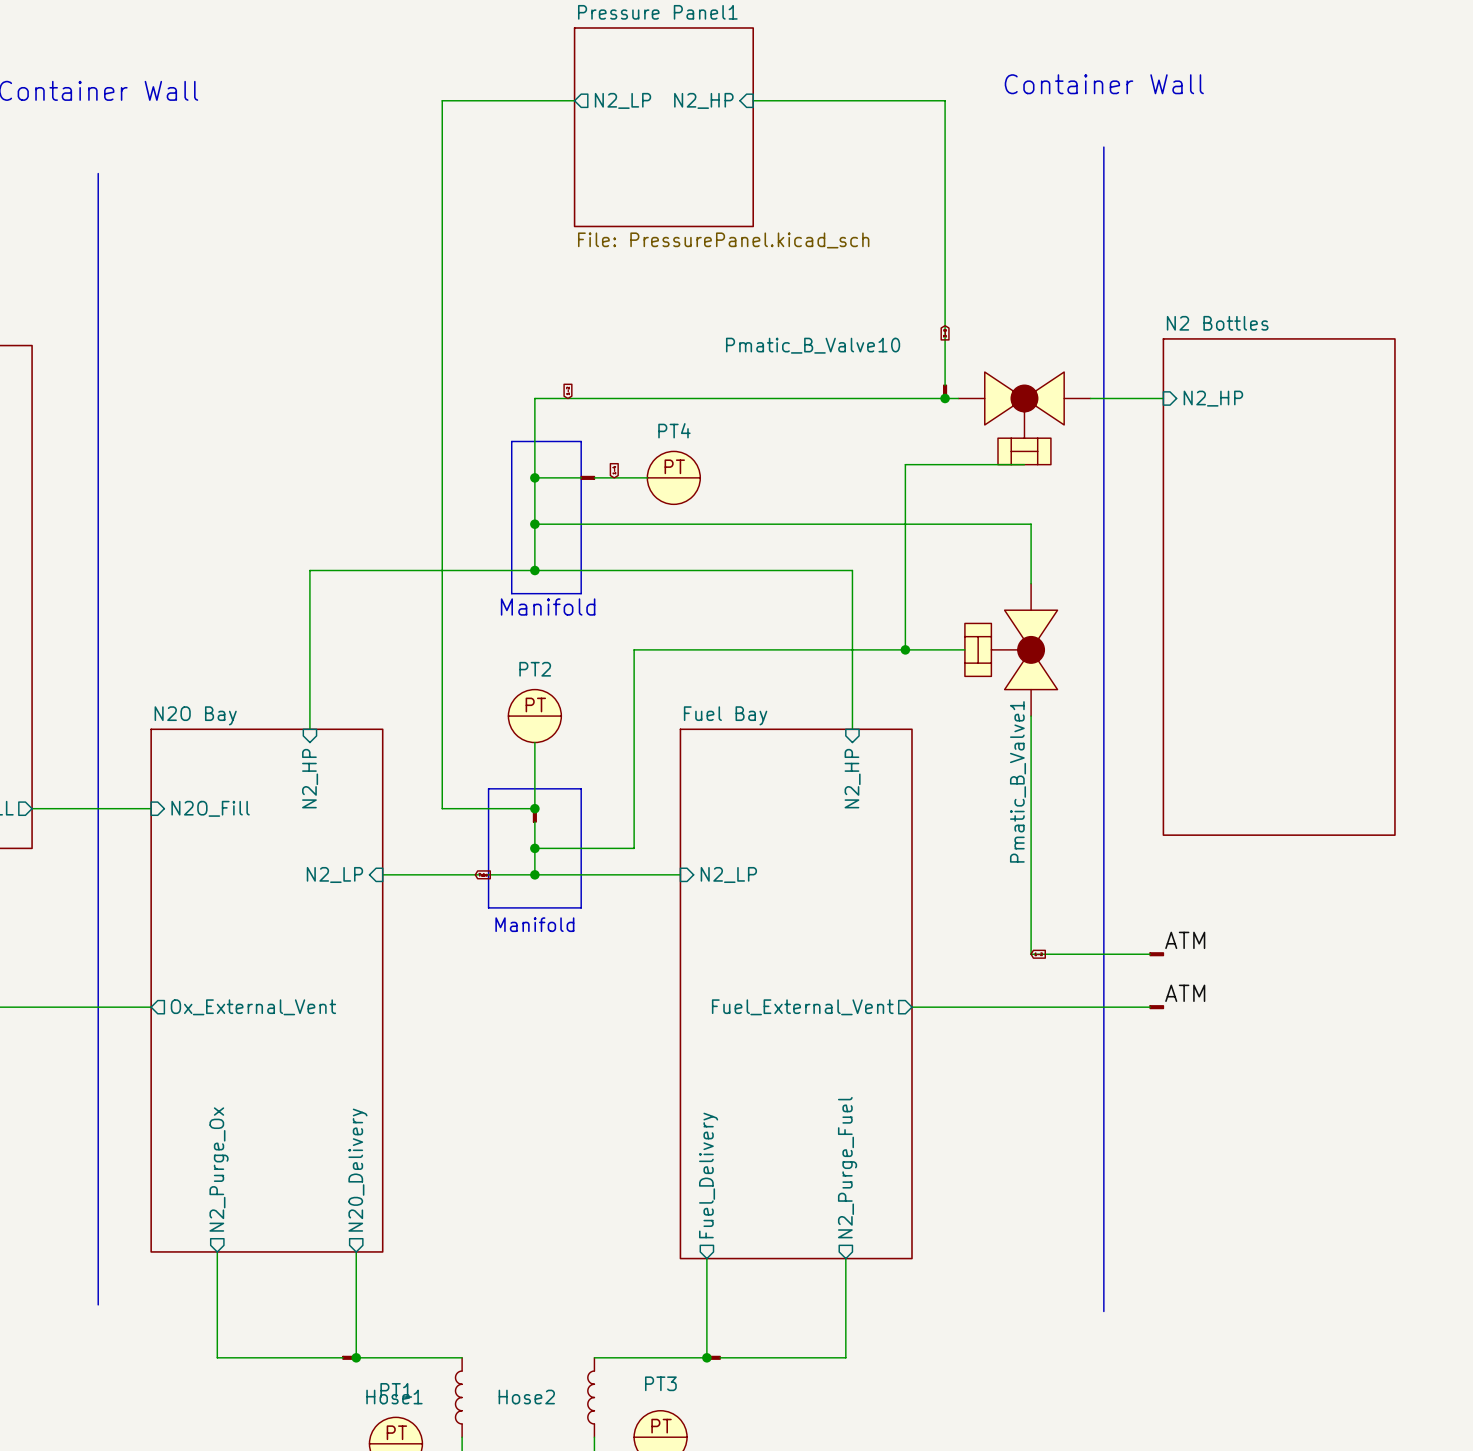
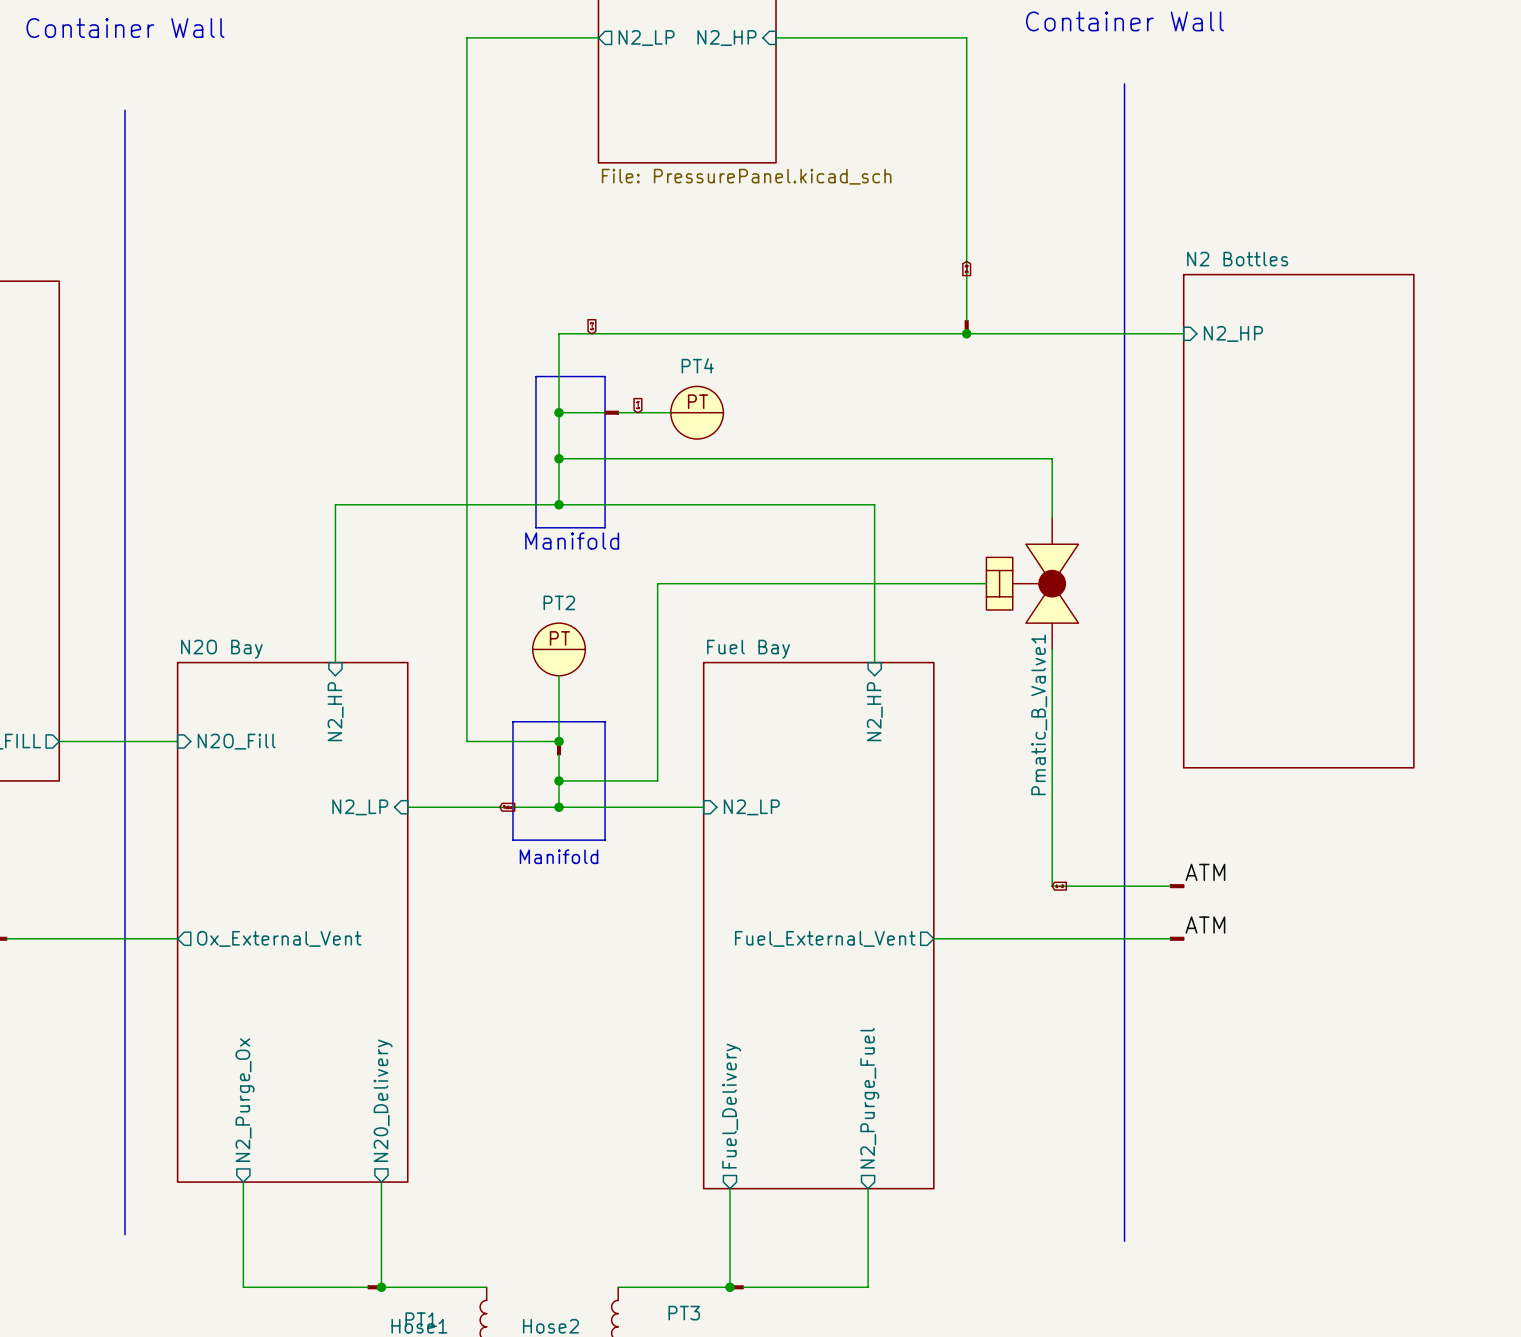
Pmatic_B_Valve10: (1024, 418) -> none
wire: (1024, 464) (905, 464) (905, 649) -> none
junction: (905, 649) -> none

